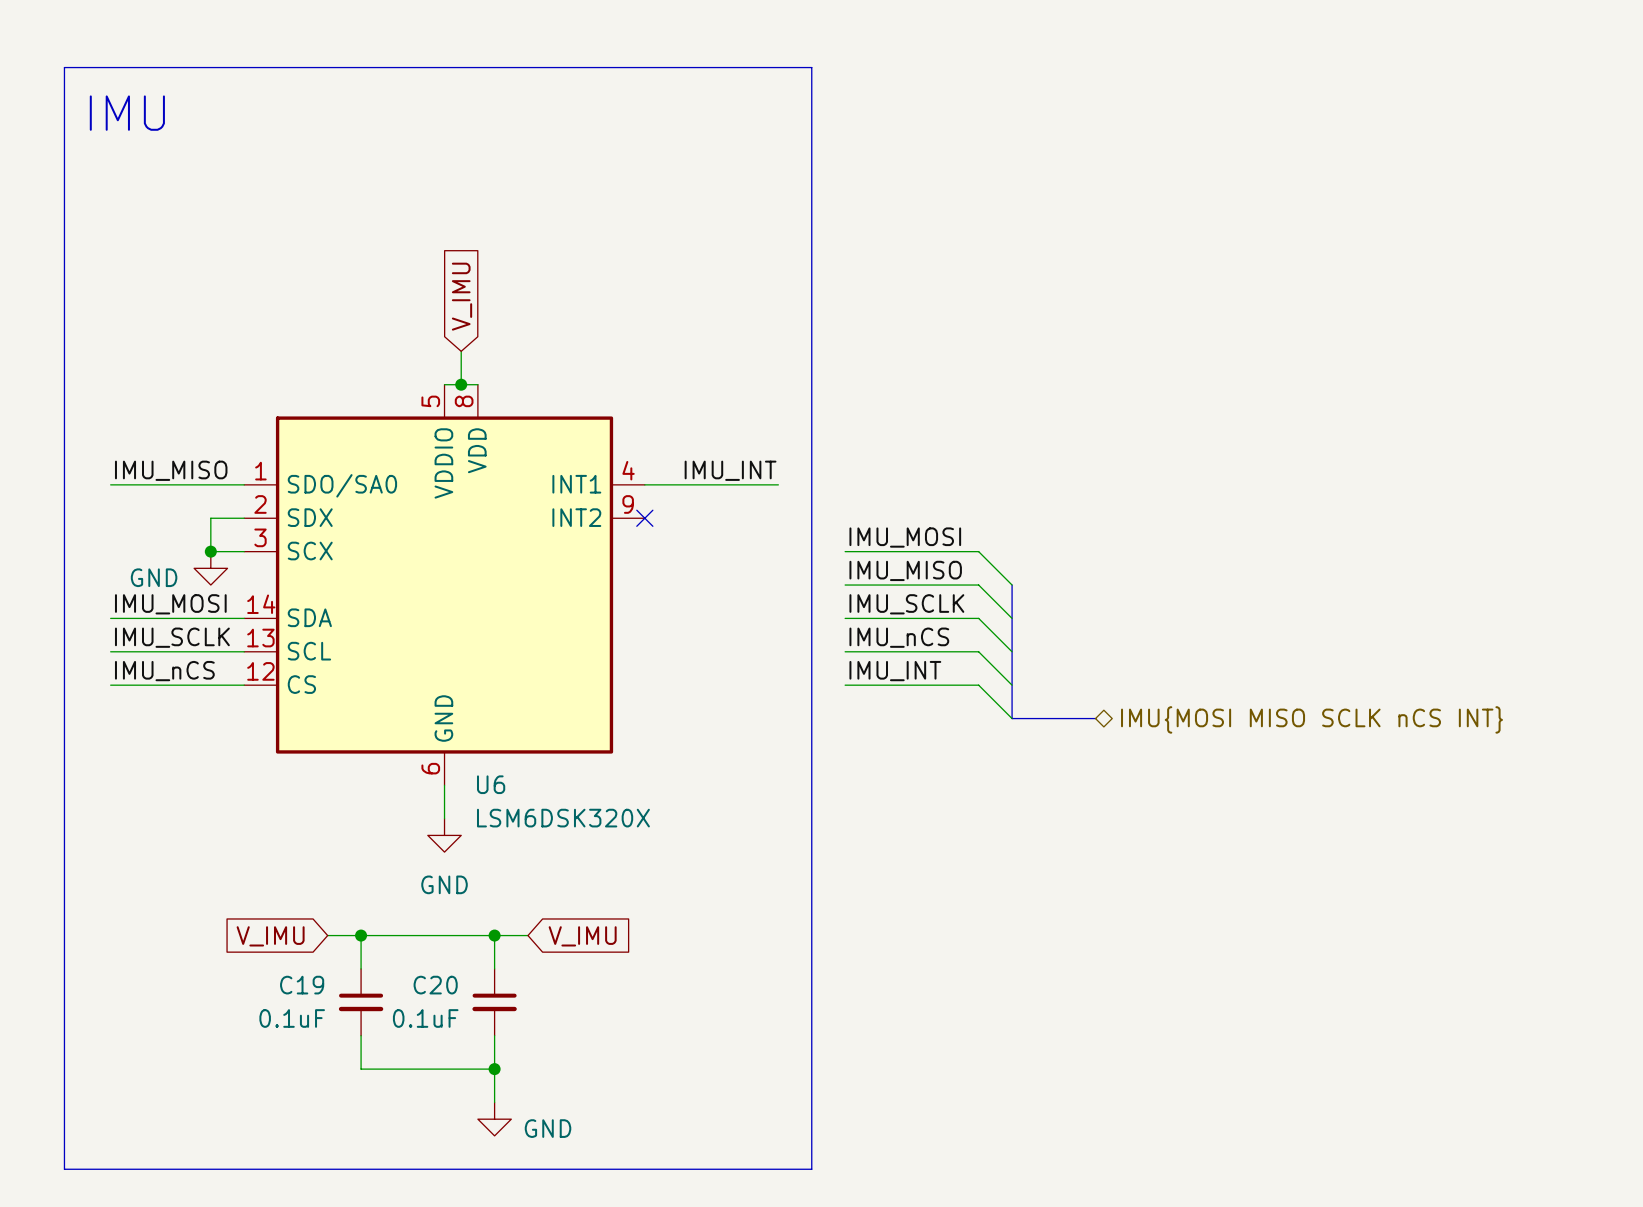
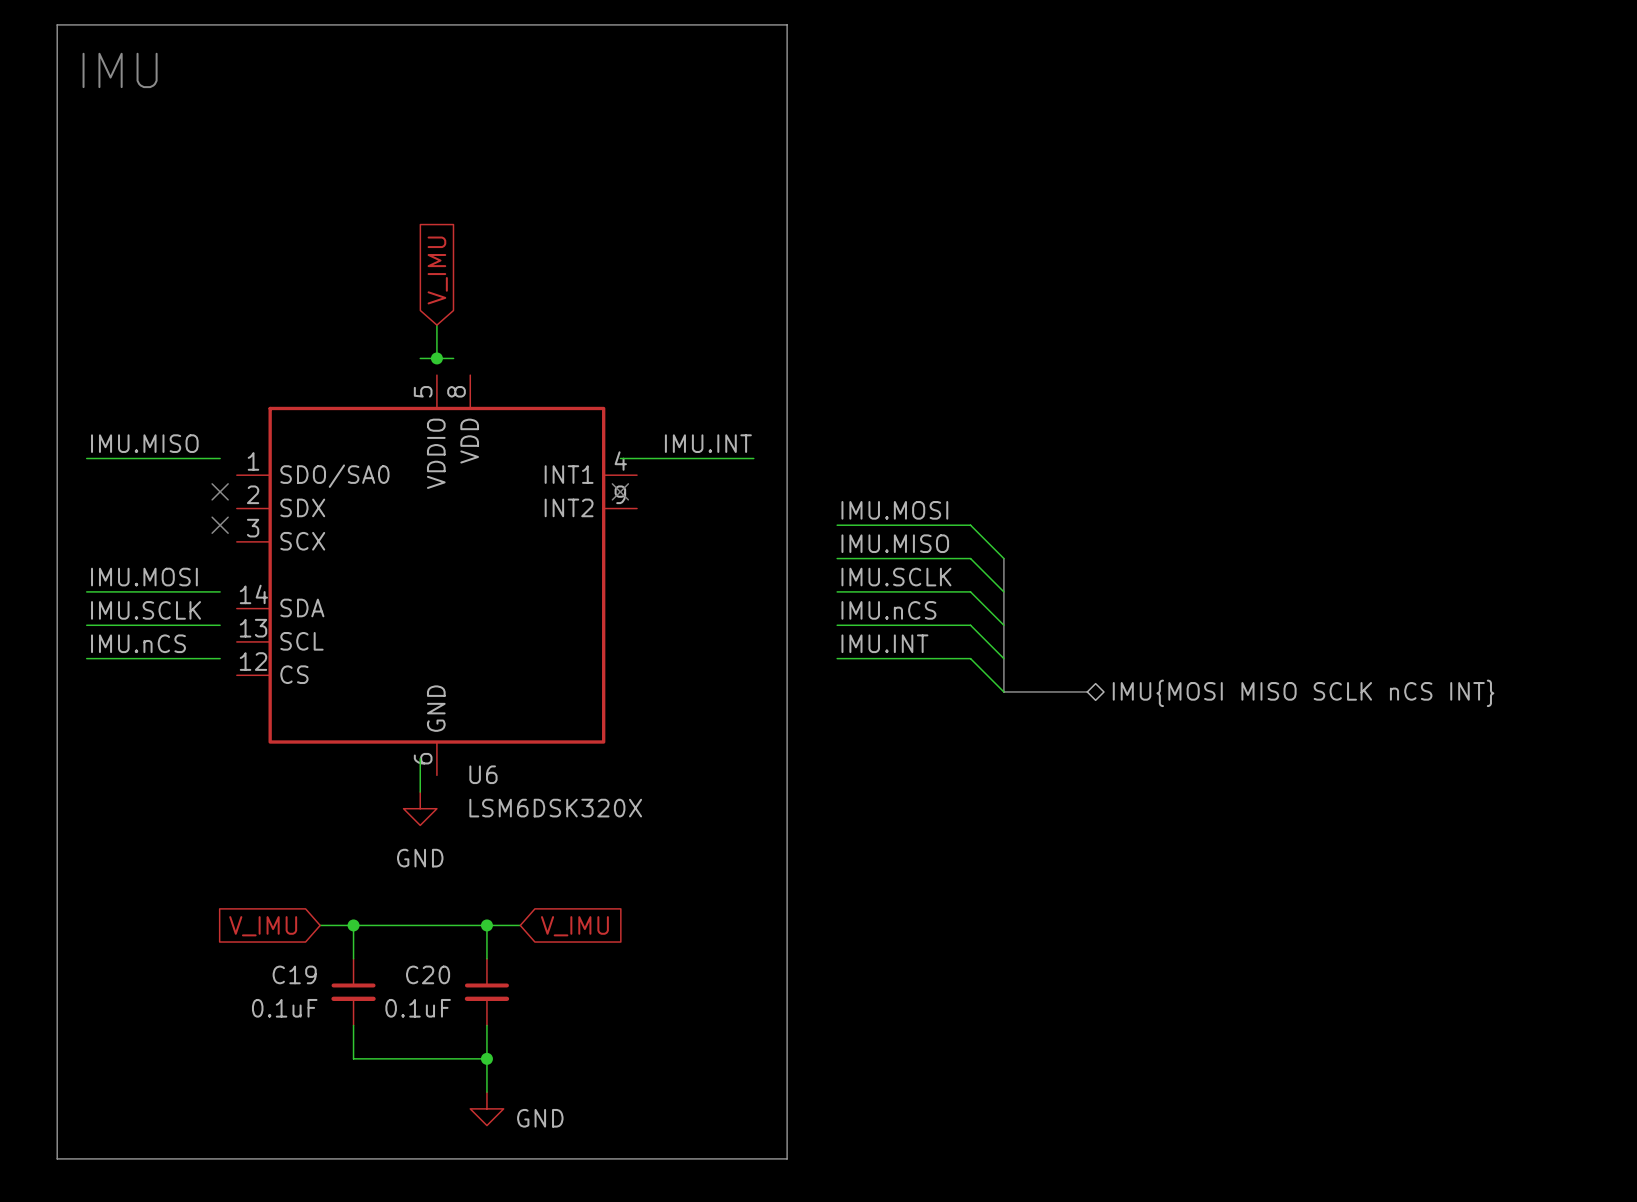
line: (64, 67) (811, 67) (811, 1169) (795, 1169) -> (57, 58) (57, 24) (787, 24) (787, 1158)
text position: IMU (127, 113) -> IMU (120, 70)
global label position: V_IMU (462, 296) -> V_IMU (437, 270)
wire: (461, 351) (461, 384) -> (436, 325) (436, 358)
wire: (444, 384) (477, 384) -> (420, 358) (453, 358)
junction position: (461, 384) -> (436, 358)
label: IMU_MISO (171, 470) -> IMU.MISO (144, 443)
label: IMU_INT (730, 470) -> IMU.INT (708, 443)
wire: (110, 484) (244, 484) -> (86, 458) (220, 458)
wire: (644, 484) (778, 484) -> (620, 458) (753, 458)
no-connect mark: none -> (220, 491)
wire: (244, 518) (210, 518) (210, 551) (244, 551) -> none
no-connect mark position: (644, 518) -> (620, 491)
label: none -> IMU.MOSI (894, 510)
no-connect mark: none -> (220, 525)
label: IMU_MOSI (905, 537) -> none
junction: (210, 551) -> none
wire: (845, 551) (978, 551) (1012, 585) -> (837, 525) (970, 525) (1003, 558)
label: none -> IMU.MISO (895, 543)
power symbol: GND (210, 568) -> none
bus: none -> (1003, 558) (1003, 575)
label: IMU_MISO (905, 570) -> none
wire: (845, 585) (978, 585) (1012, 618) -> (837, 558) (970, 558) (1003, 591)
label: IMU_MOSI (170, 604) -> IMU.MOSI (144, 577)
label: IMU_SCLK (906, 604) -> IMU.SCLK (896, 577)
wire: (110, 618) (244, 618) -> (86, 591) (220, 591)
wire: (845, 618) (978, 618) (1012, 651) -> (837, 591) (970, 591) (1003, 625)
label: IMU_SCLK (172, 637) -> IMU.SCLK (146, 610)
label: IMU_nCS (899, 637) -> IMU.nCS (888, 610)
wire: (110, 651) (244, 651) -> (86, 625) (220, 625)
wire: (845, 651) (978, 651) (1012, 685) -> (837, 625) (970, 625) (1003, 658)
label: IMU_nCS (164, 671) -> IMU.nCS (138, 643)
label: IMU_INT (895, 671) -> IMU.INT (884, 643)
wire: (110, 685) (244, 685) -> (86, 658) (220, 658)
wire: (845, 685) (978, 685) (1012, 718) -> (837, 658) (970, 658) (1003, 691)
bus: (1012, 701) (1012, 718) (1095, 718) -> (1003, 691) (1087, 691)
hierarchical label position: IMU{MOSI MISO SCLK nCS INT} (1311, 719) -> IMU{MOSI MISO SCLK nCS INT} (1303, 693)
wire: (444, 785) (444, 818) -> (420, 758) (420, 792)
power symbol position: GND (444, 835) -> GND (420, 808)

